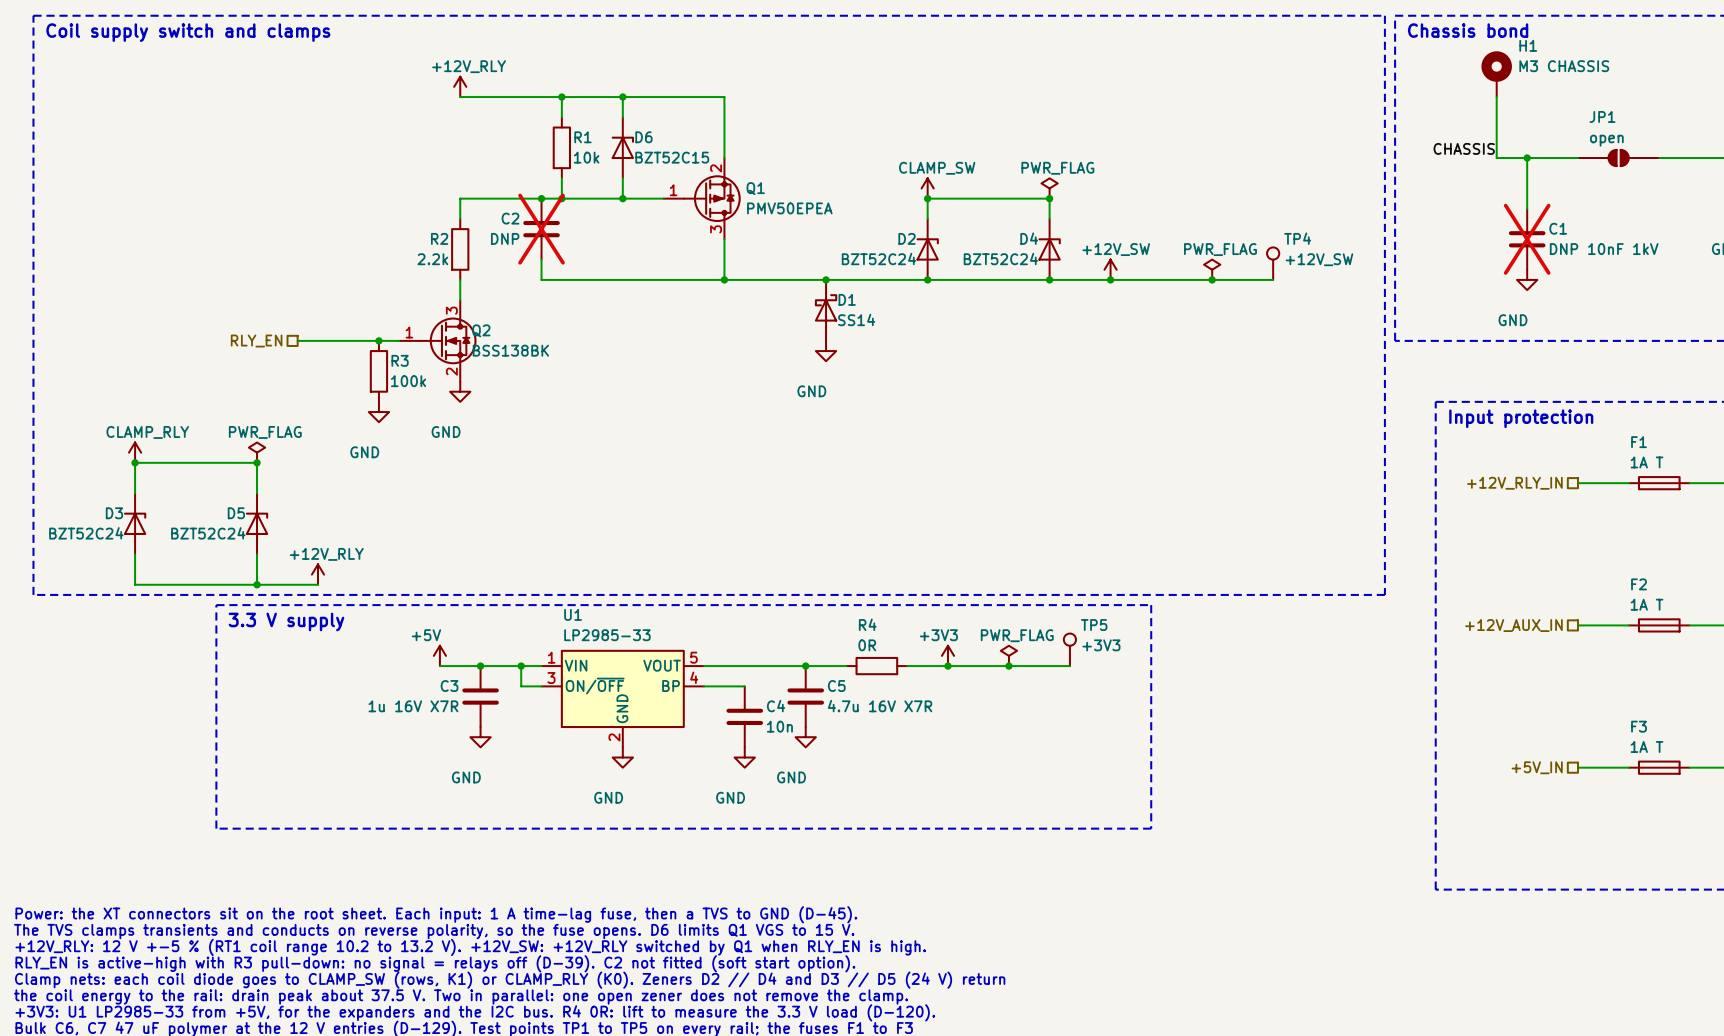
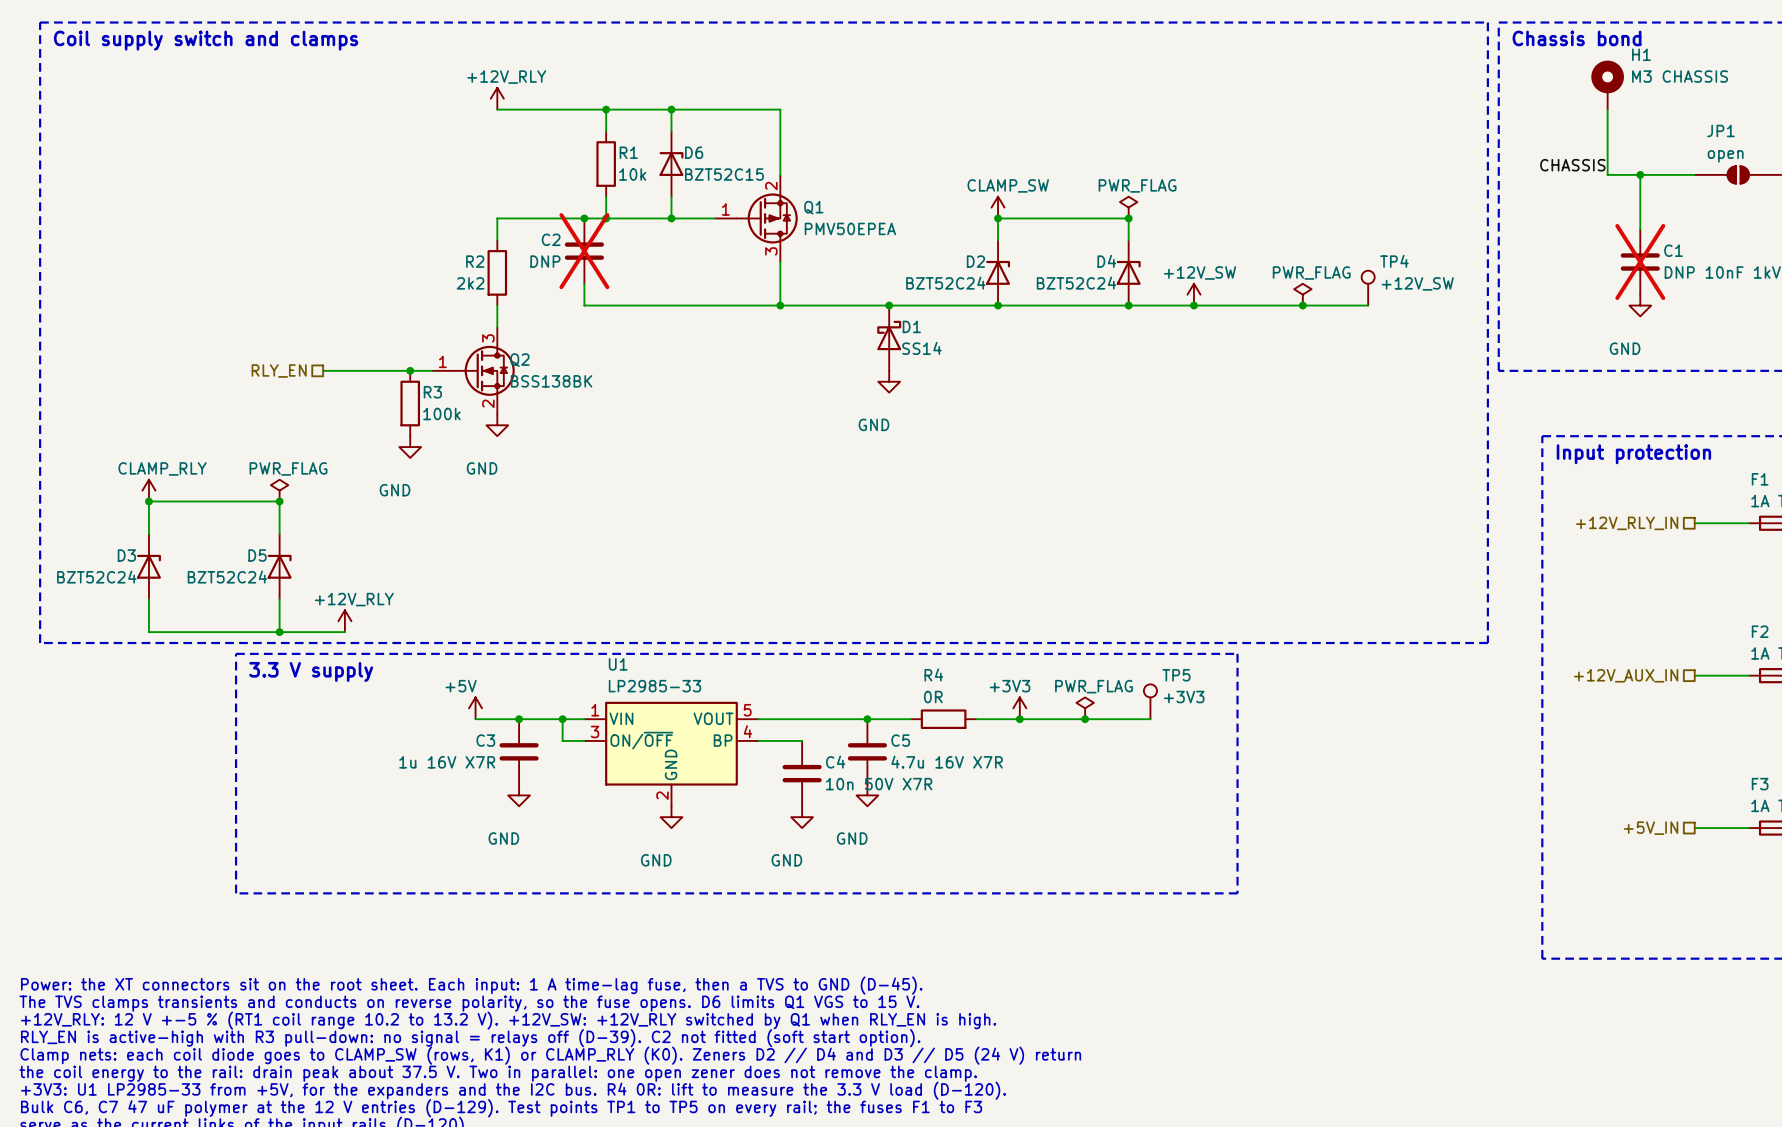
R2 value: 2.2k (432, 259) -> 2k2 (470, 283)
C4 value: 10n (779, 726) -> 10n 50V X7R (879, 784)

